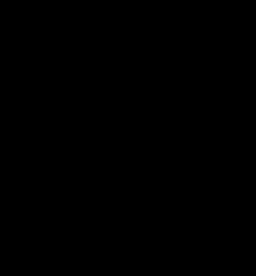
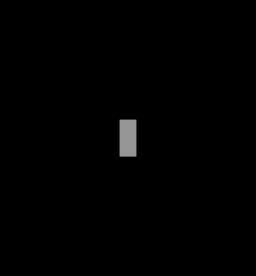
part: none -> (128, 138)

